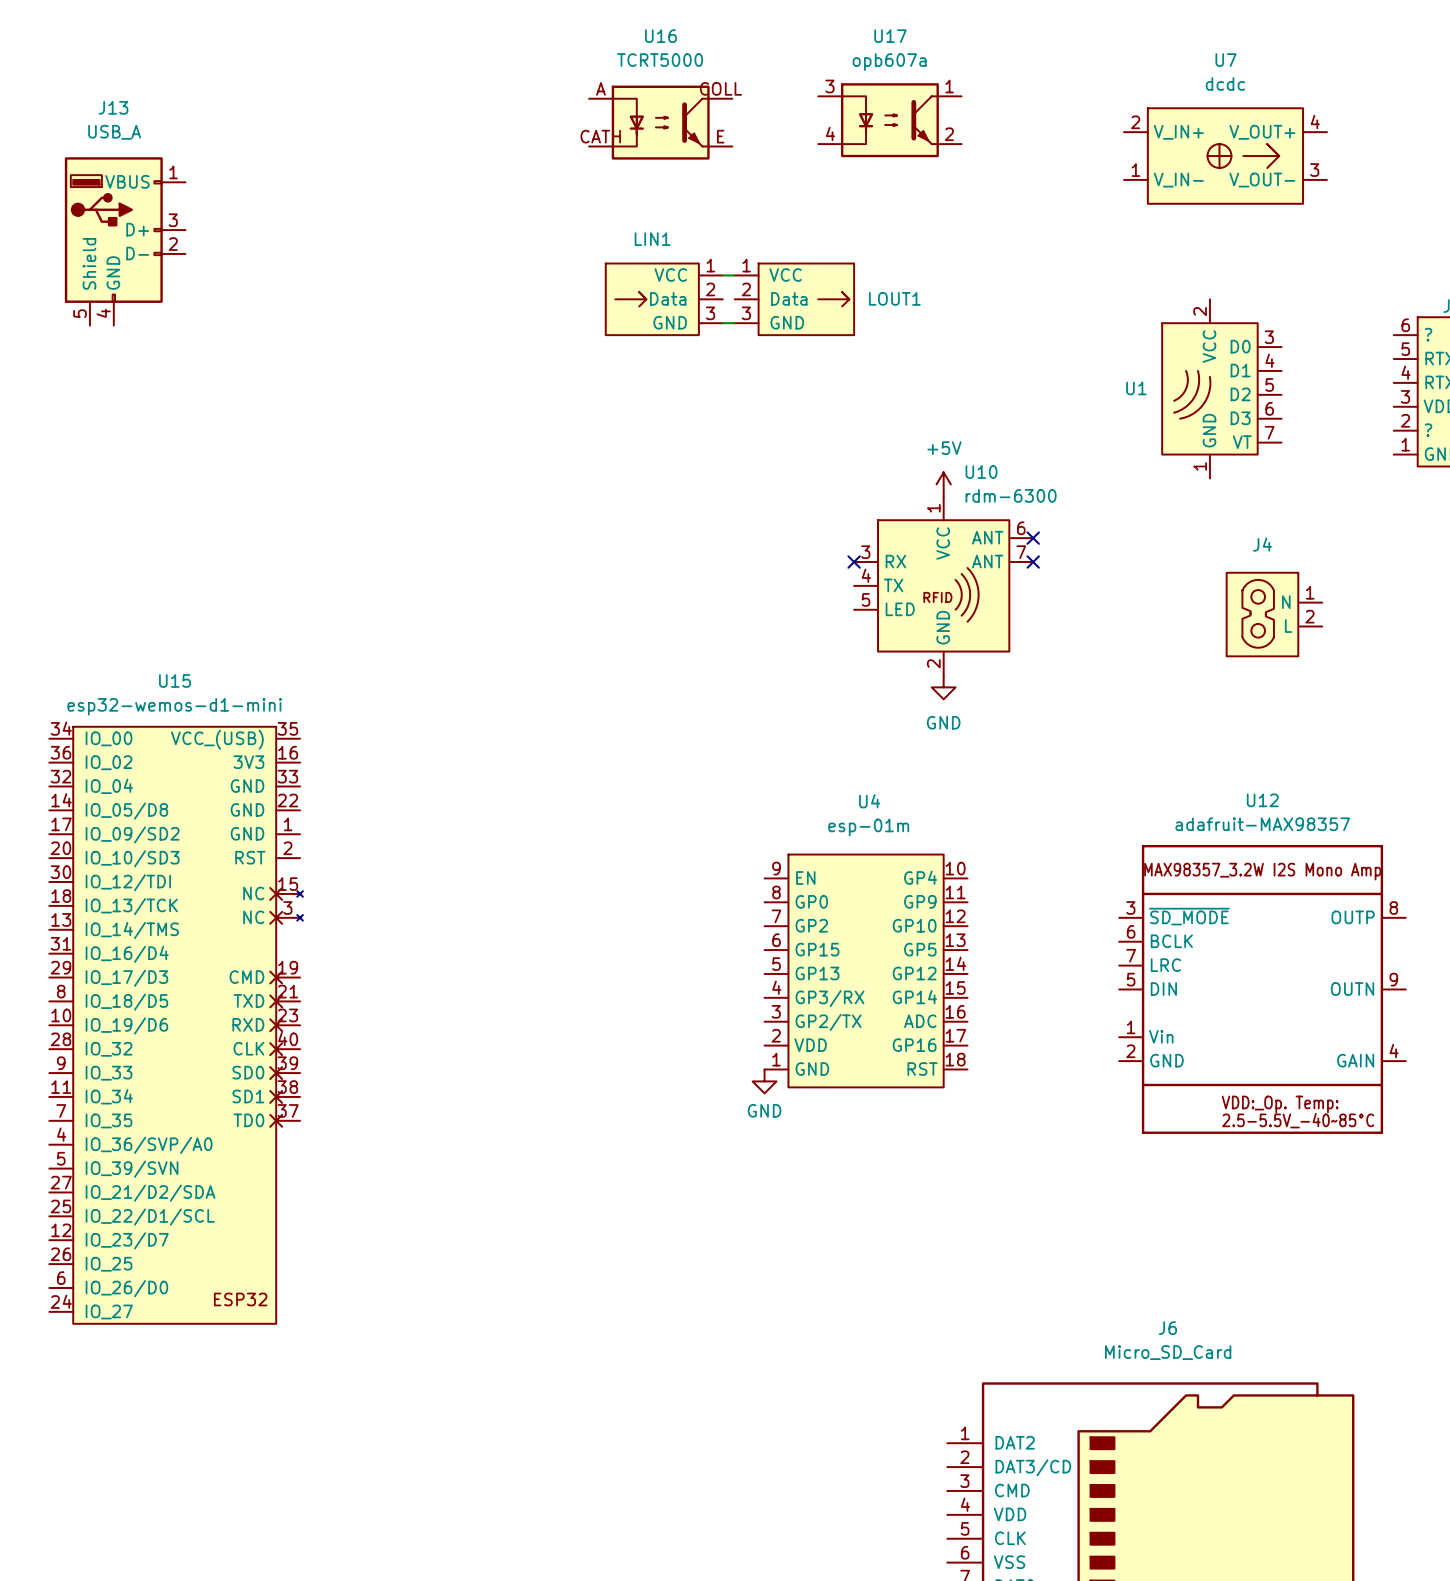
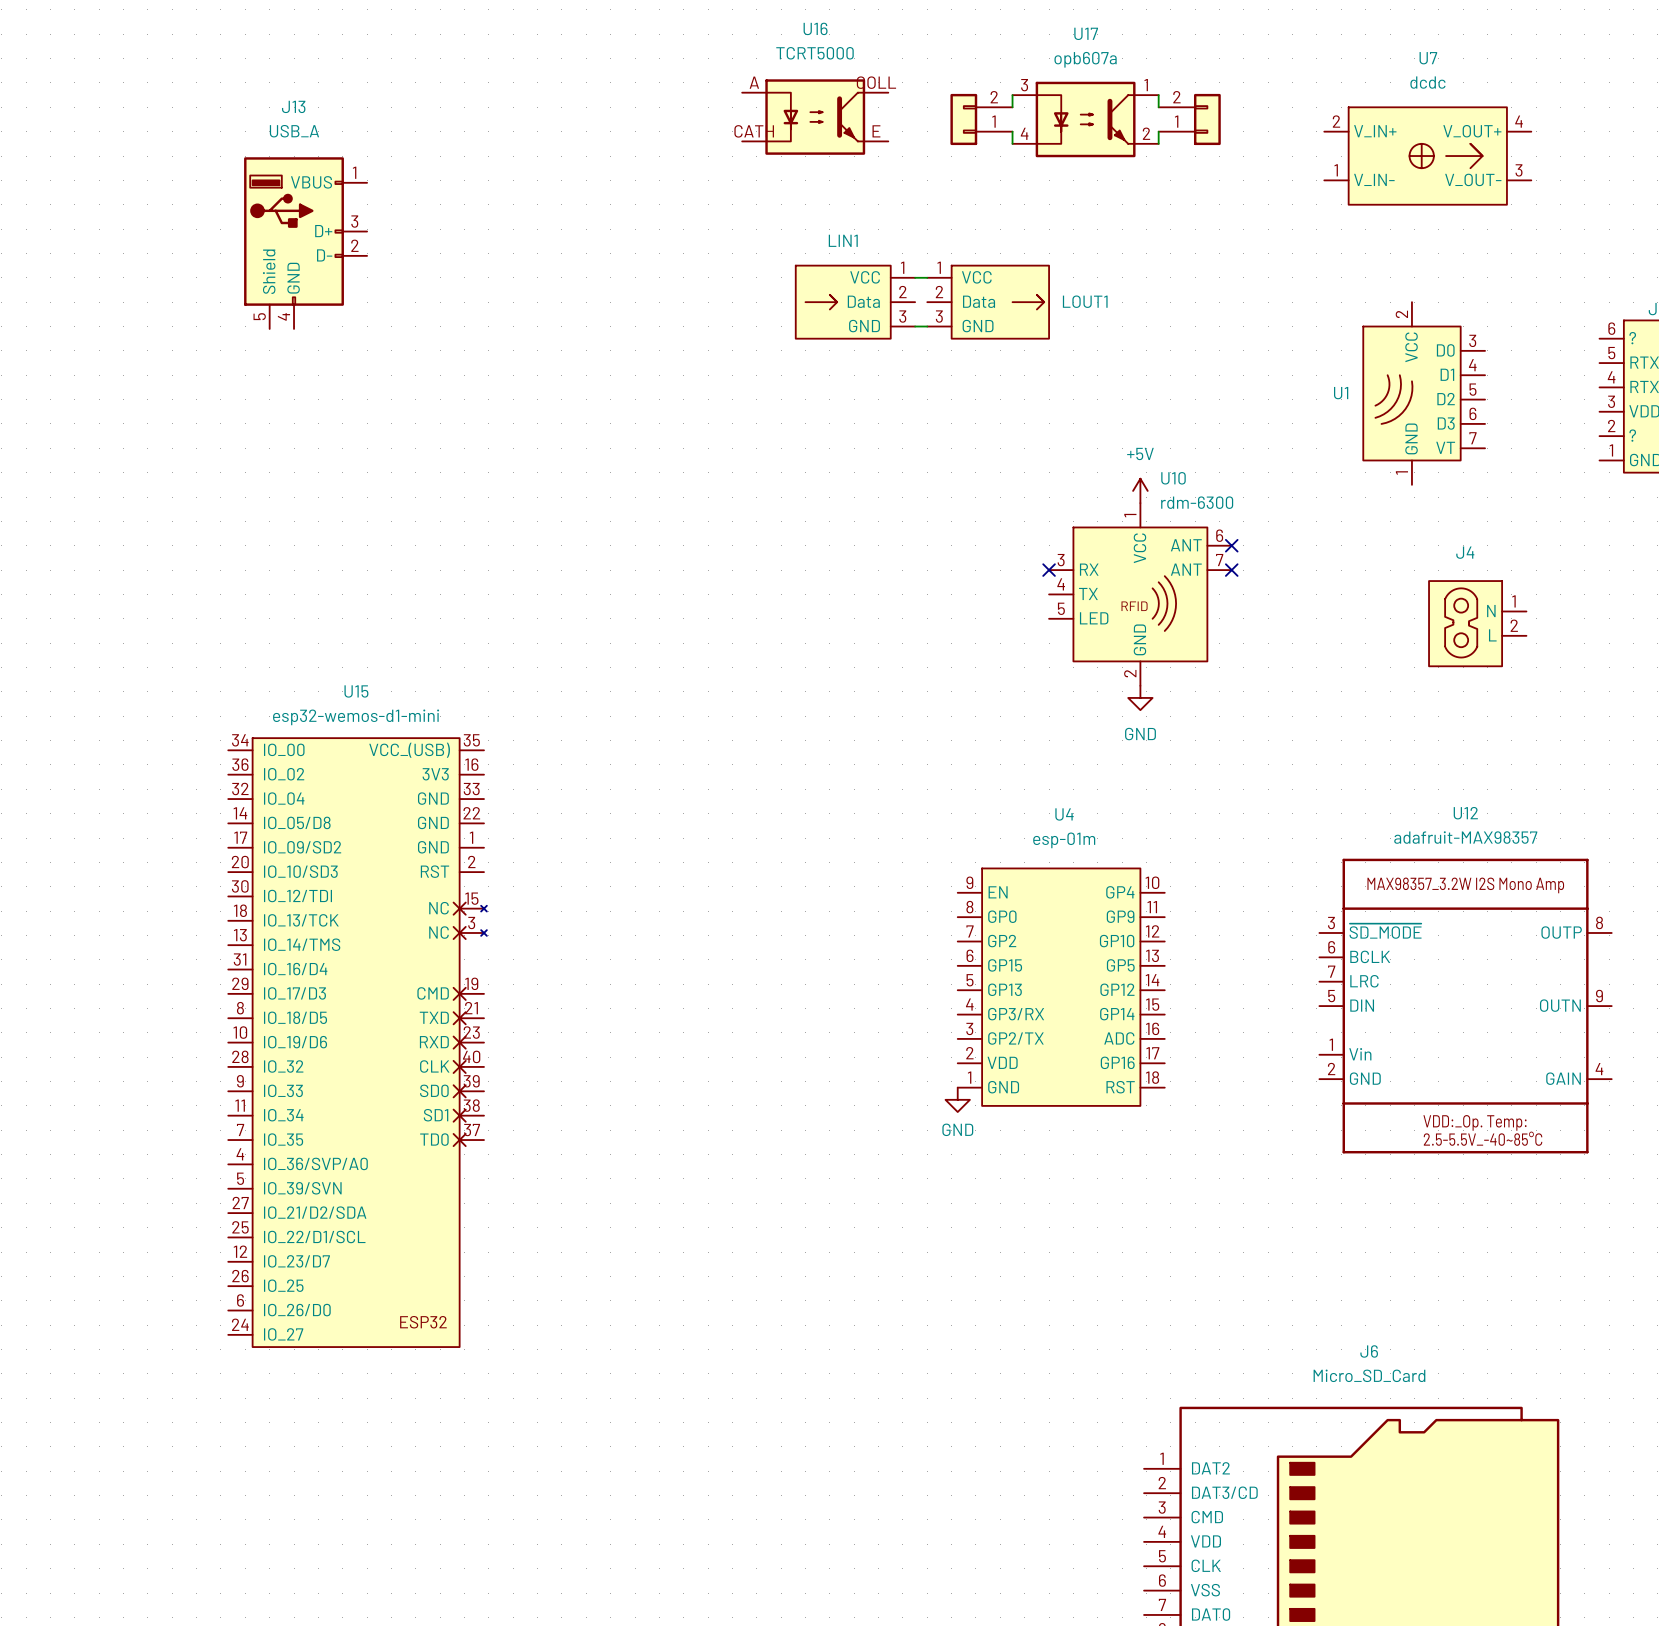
wire: none -> (1012, 95) (1012, 107)
wire: none -> (1158, 95) (1158, 107)
part: none -> (981, 119)
part: none -> (1189, 119)
U16 position: (660, 122) -> (815, 117)
wire: none -> (1012, 131) (1012, 143)
wire: none -> (1158, 131) (1158, 143)

